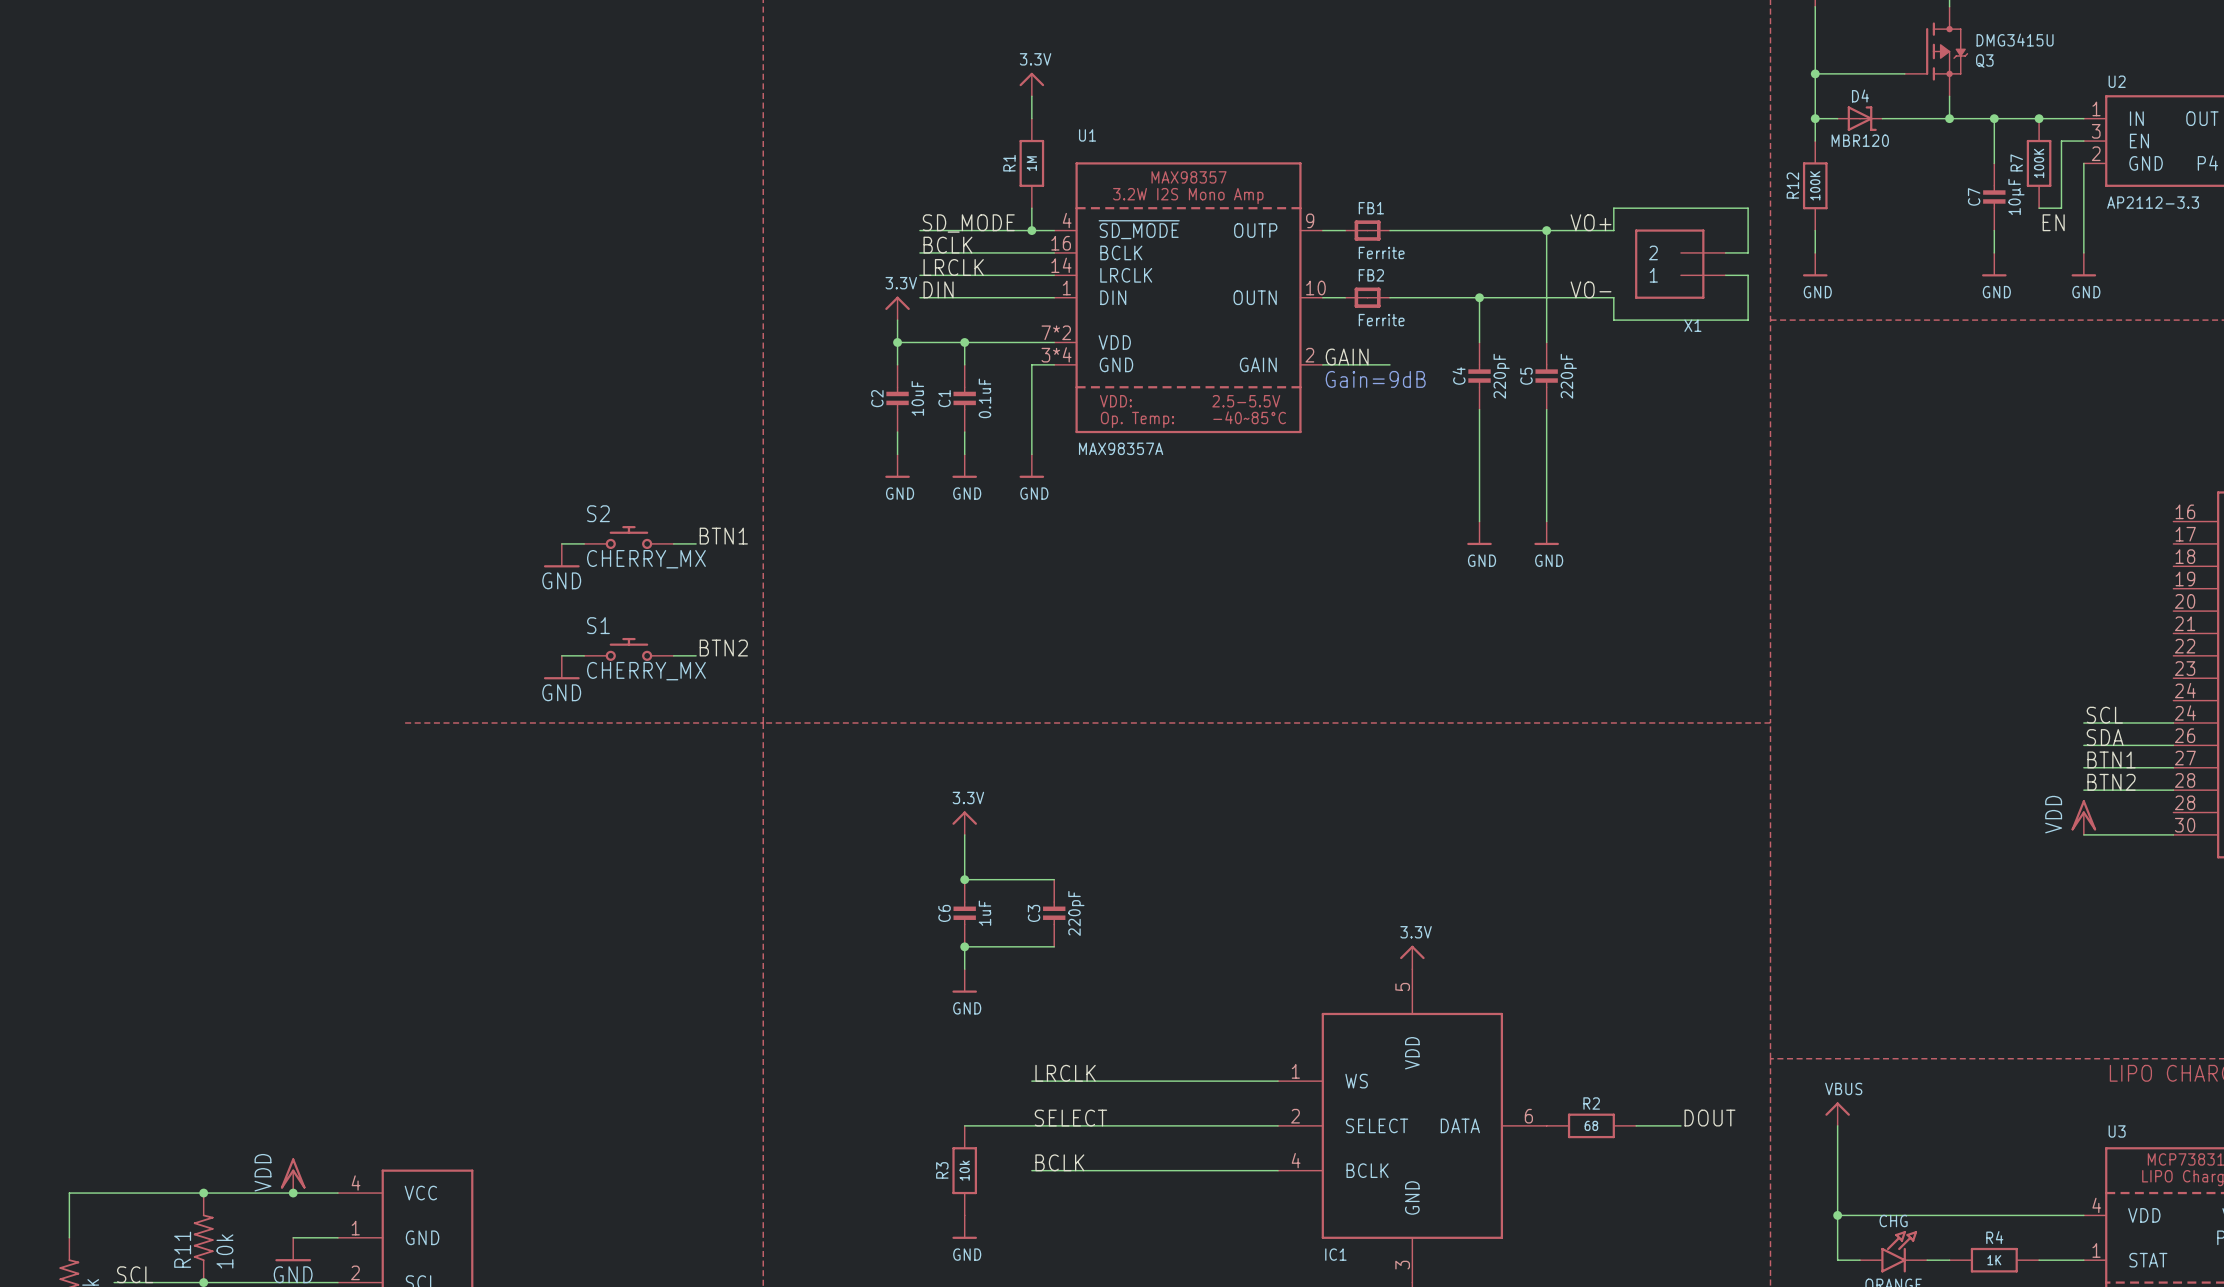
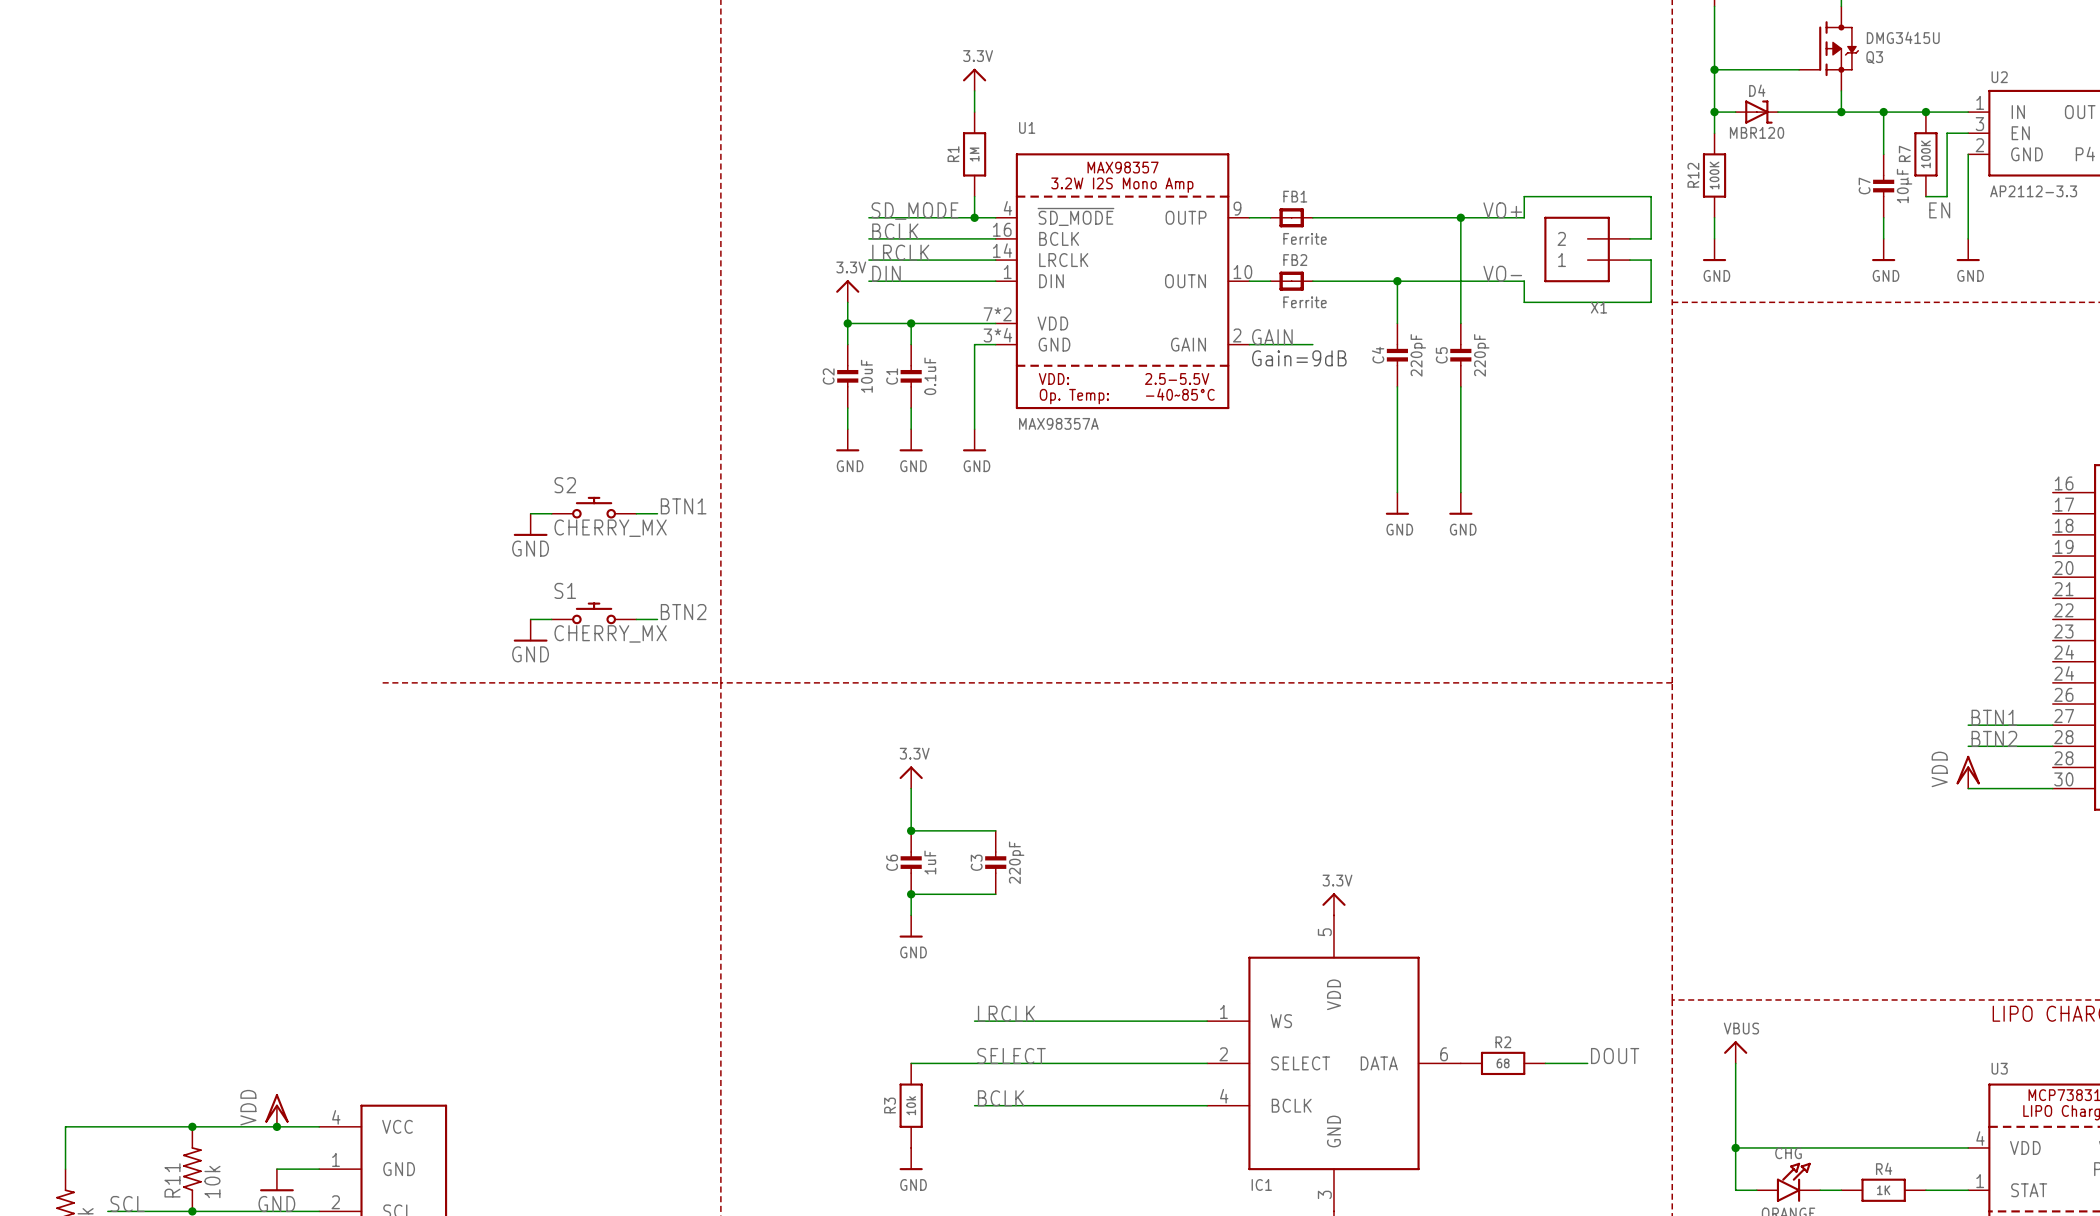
label: SCL (2104, 715) -> none
wire: (2083, 722) (2173, 722) -> none
label: SDA (2105, 737) -> none
wire: (2083, 745) (2173, 745) -> none

